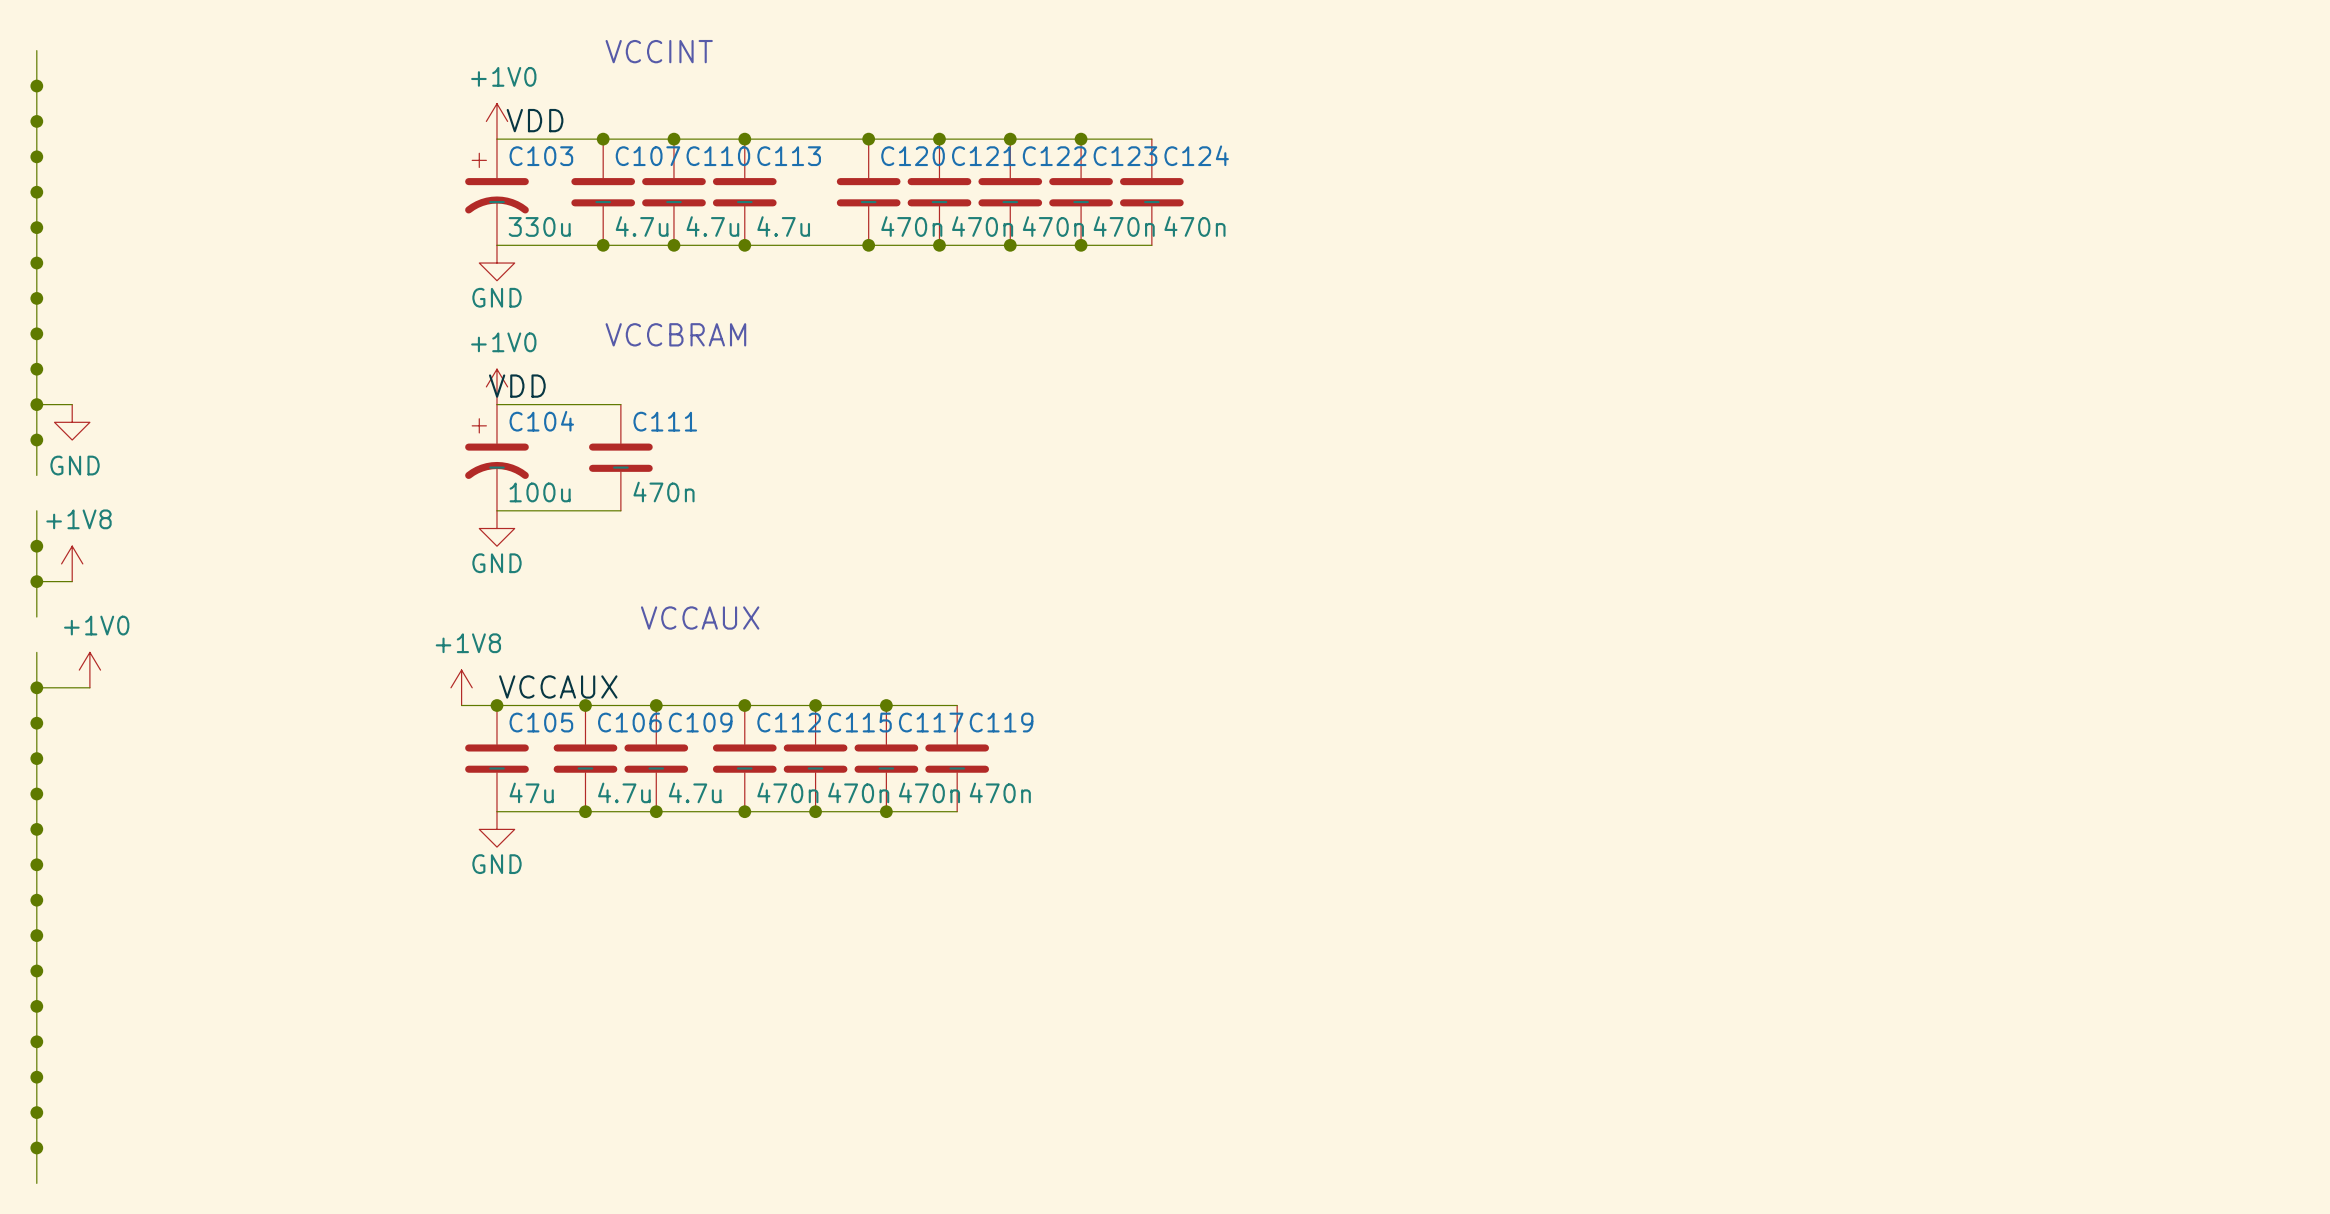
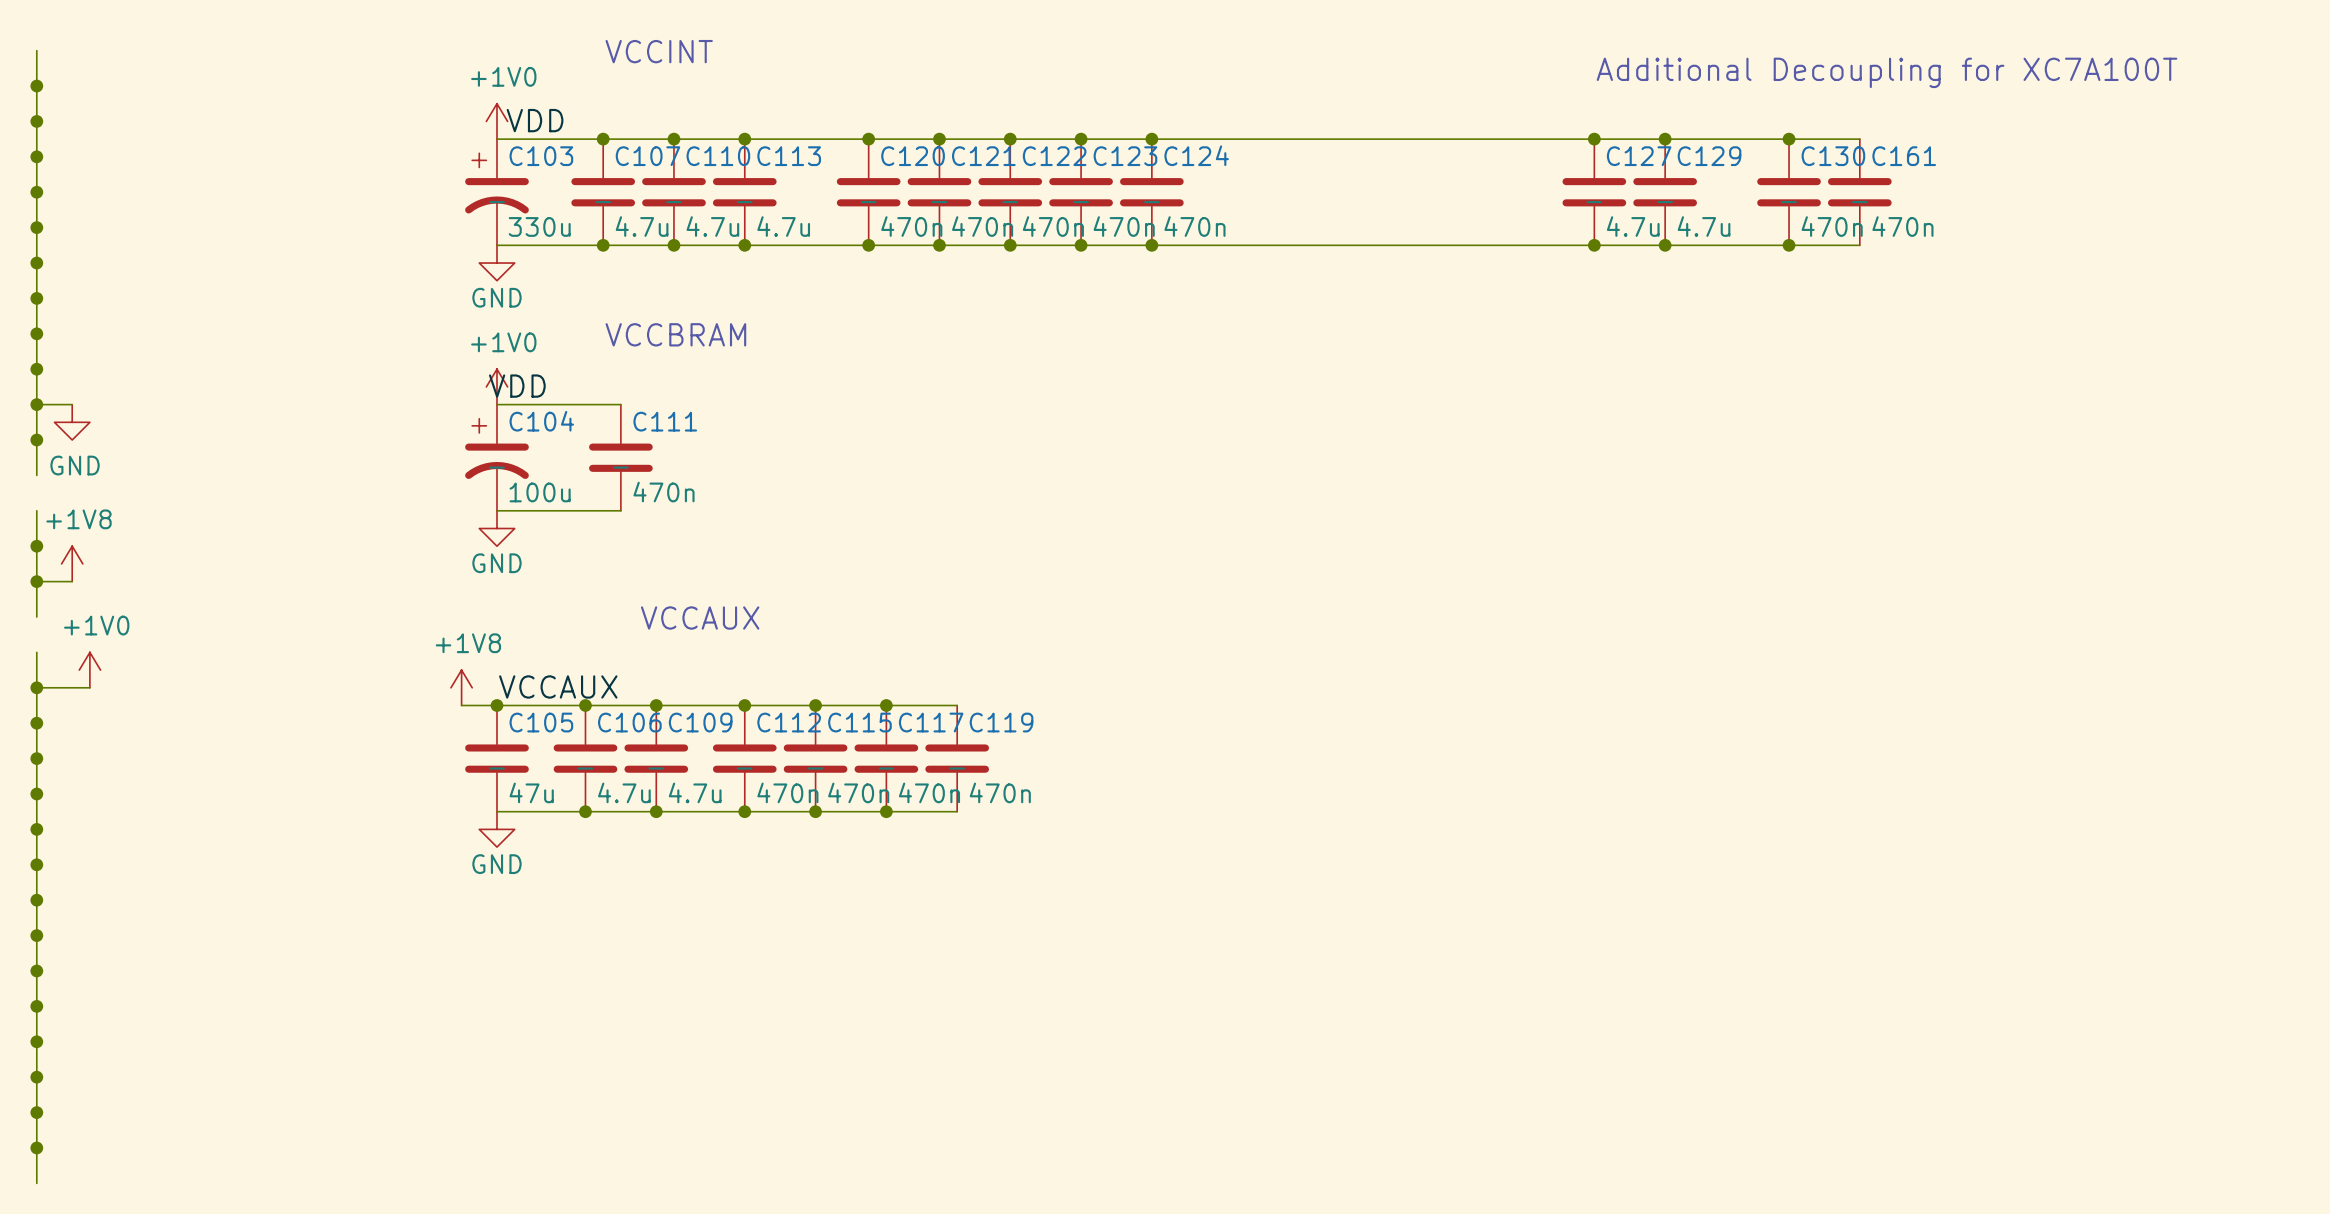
text: none -> Additional Decoupling for XC7A100T (1887, 72)
wire: none -> (1151, 139) (1859, 139)
junction: none -> (1151, 139)
junction: none -> (1594, 139)
junction: none -> (1665, 139)
junction: none -> (1789, 139)
C127: none -> 4.7u (1594, 192)
C129: none -> 4.7u (1665, 192)
C130: none -> 470n (1789, 192)
C161: none -> 470n (1859, 192)
wire: none -> (1151, 245) (1859, 245)
junction: none -> (1151, 245)
junction: none -> (1594, 245)
junction: none -> (1665, 245)
junction: none -> (1789, 245)

